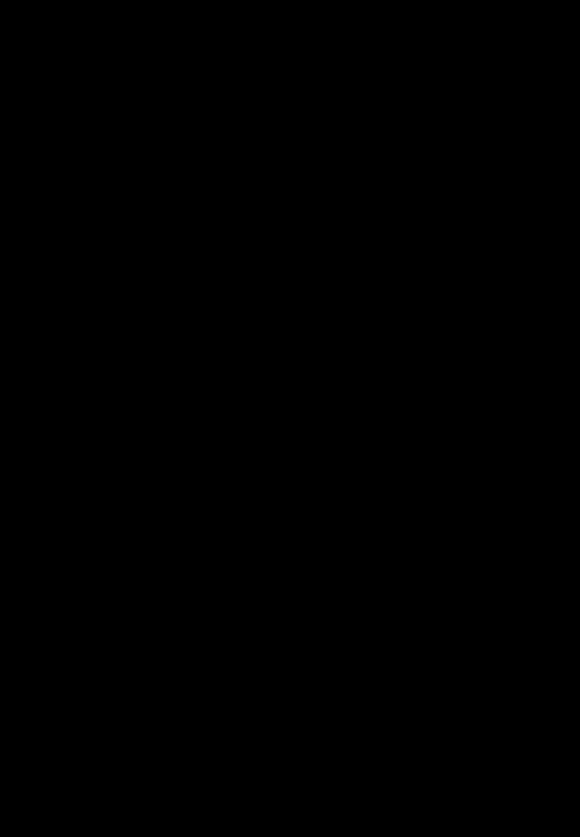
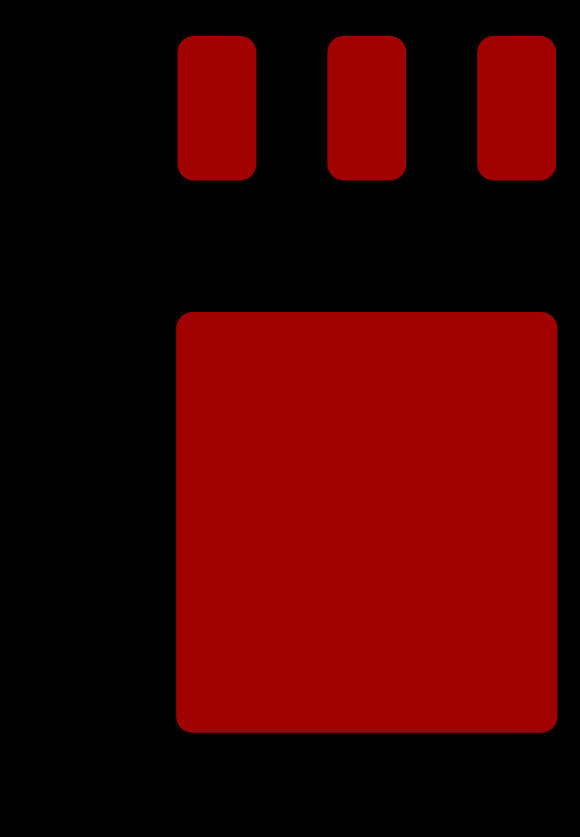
part: none -> (366, 384)

